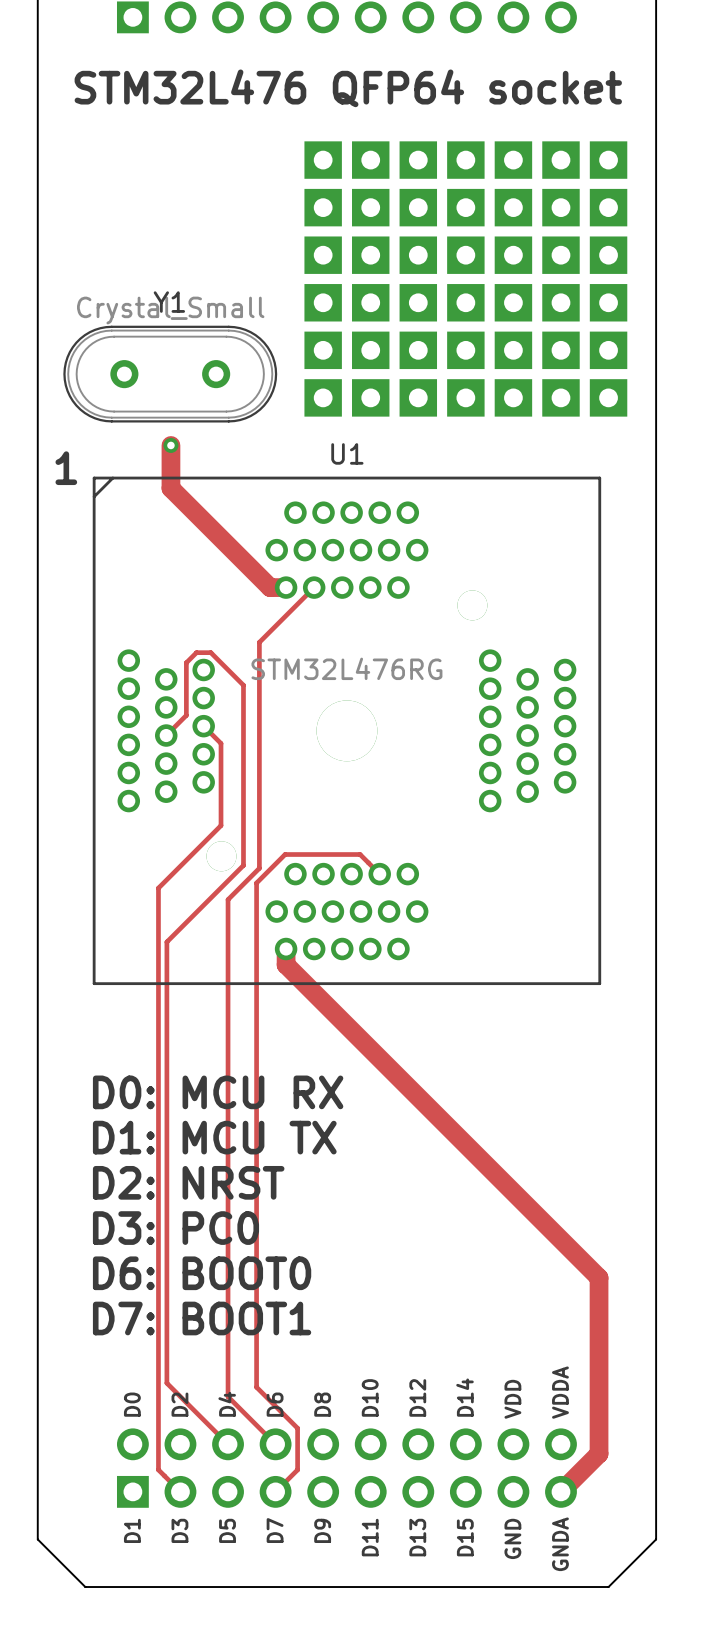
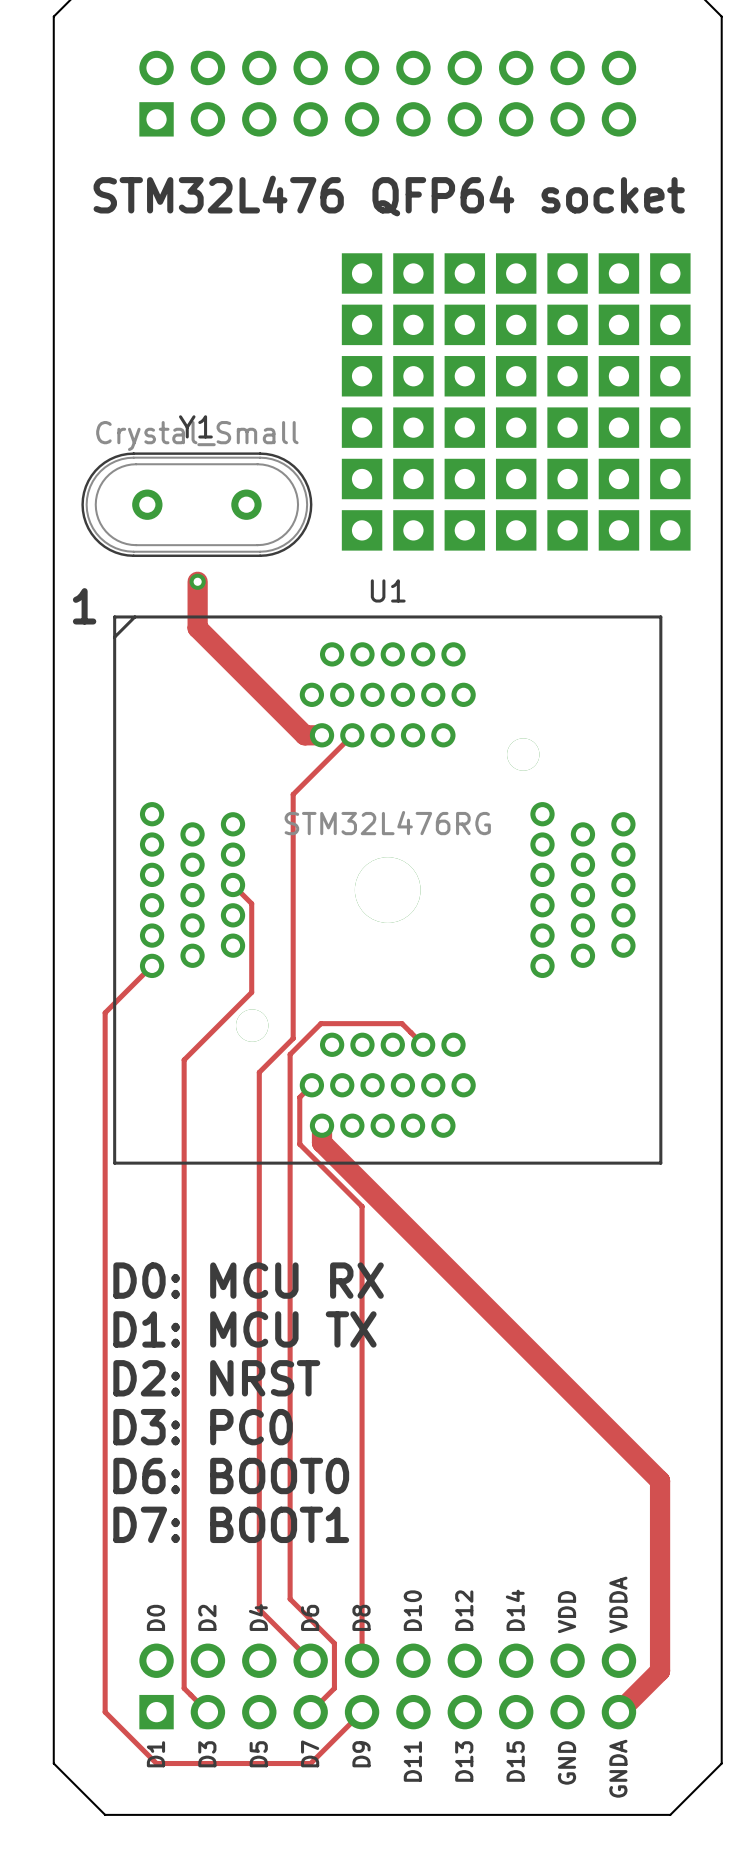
track: (166, 735) (186, 715) (186, 662) (196, 652) (210, 652) (243, 685) (243, 865) (166, 942) (166, 1383) (228, 1444) -> none
track: none -> (152, 965) (105, 1012) (105, 1712) (156, 1763) (310, 1763) (362, 1712)
track: none -> (311, 1085) (299, 1097) (299, 1144) (362, 1206) (362, 1660)

